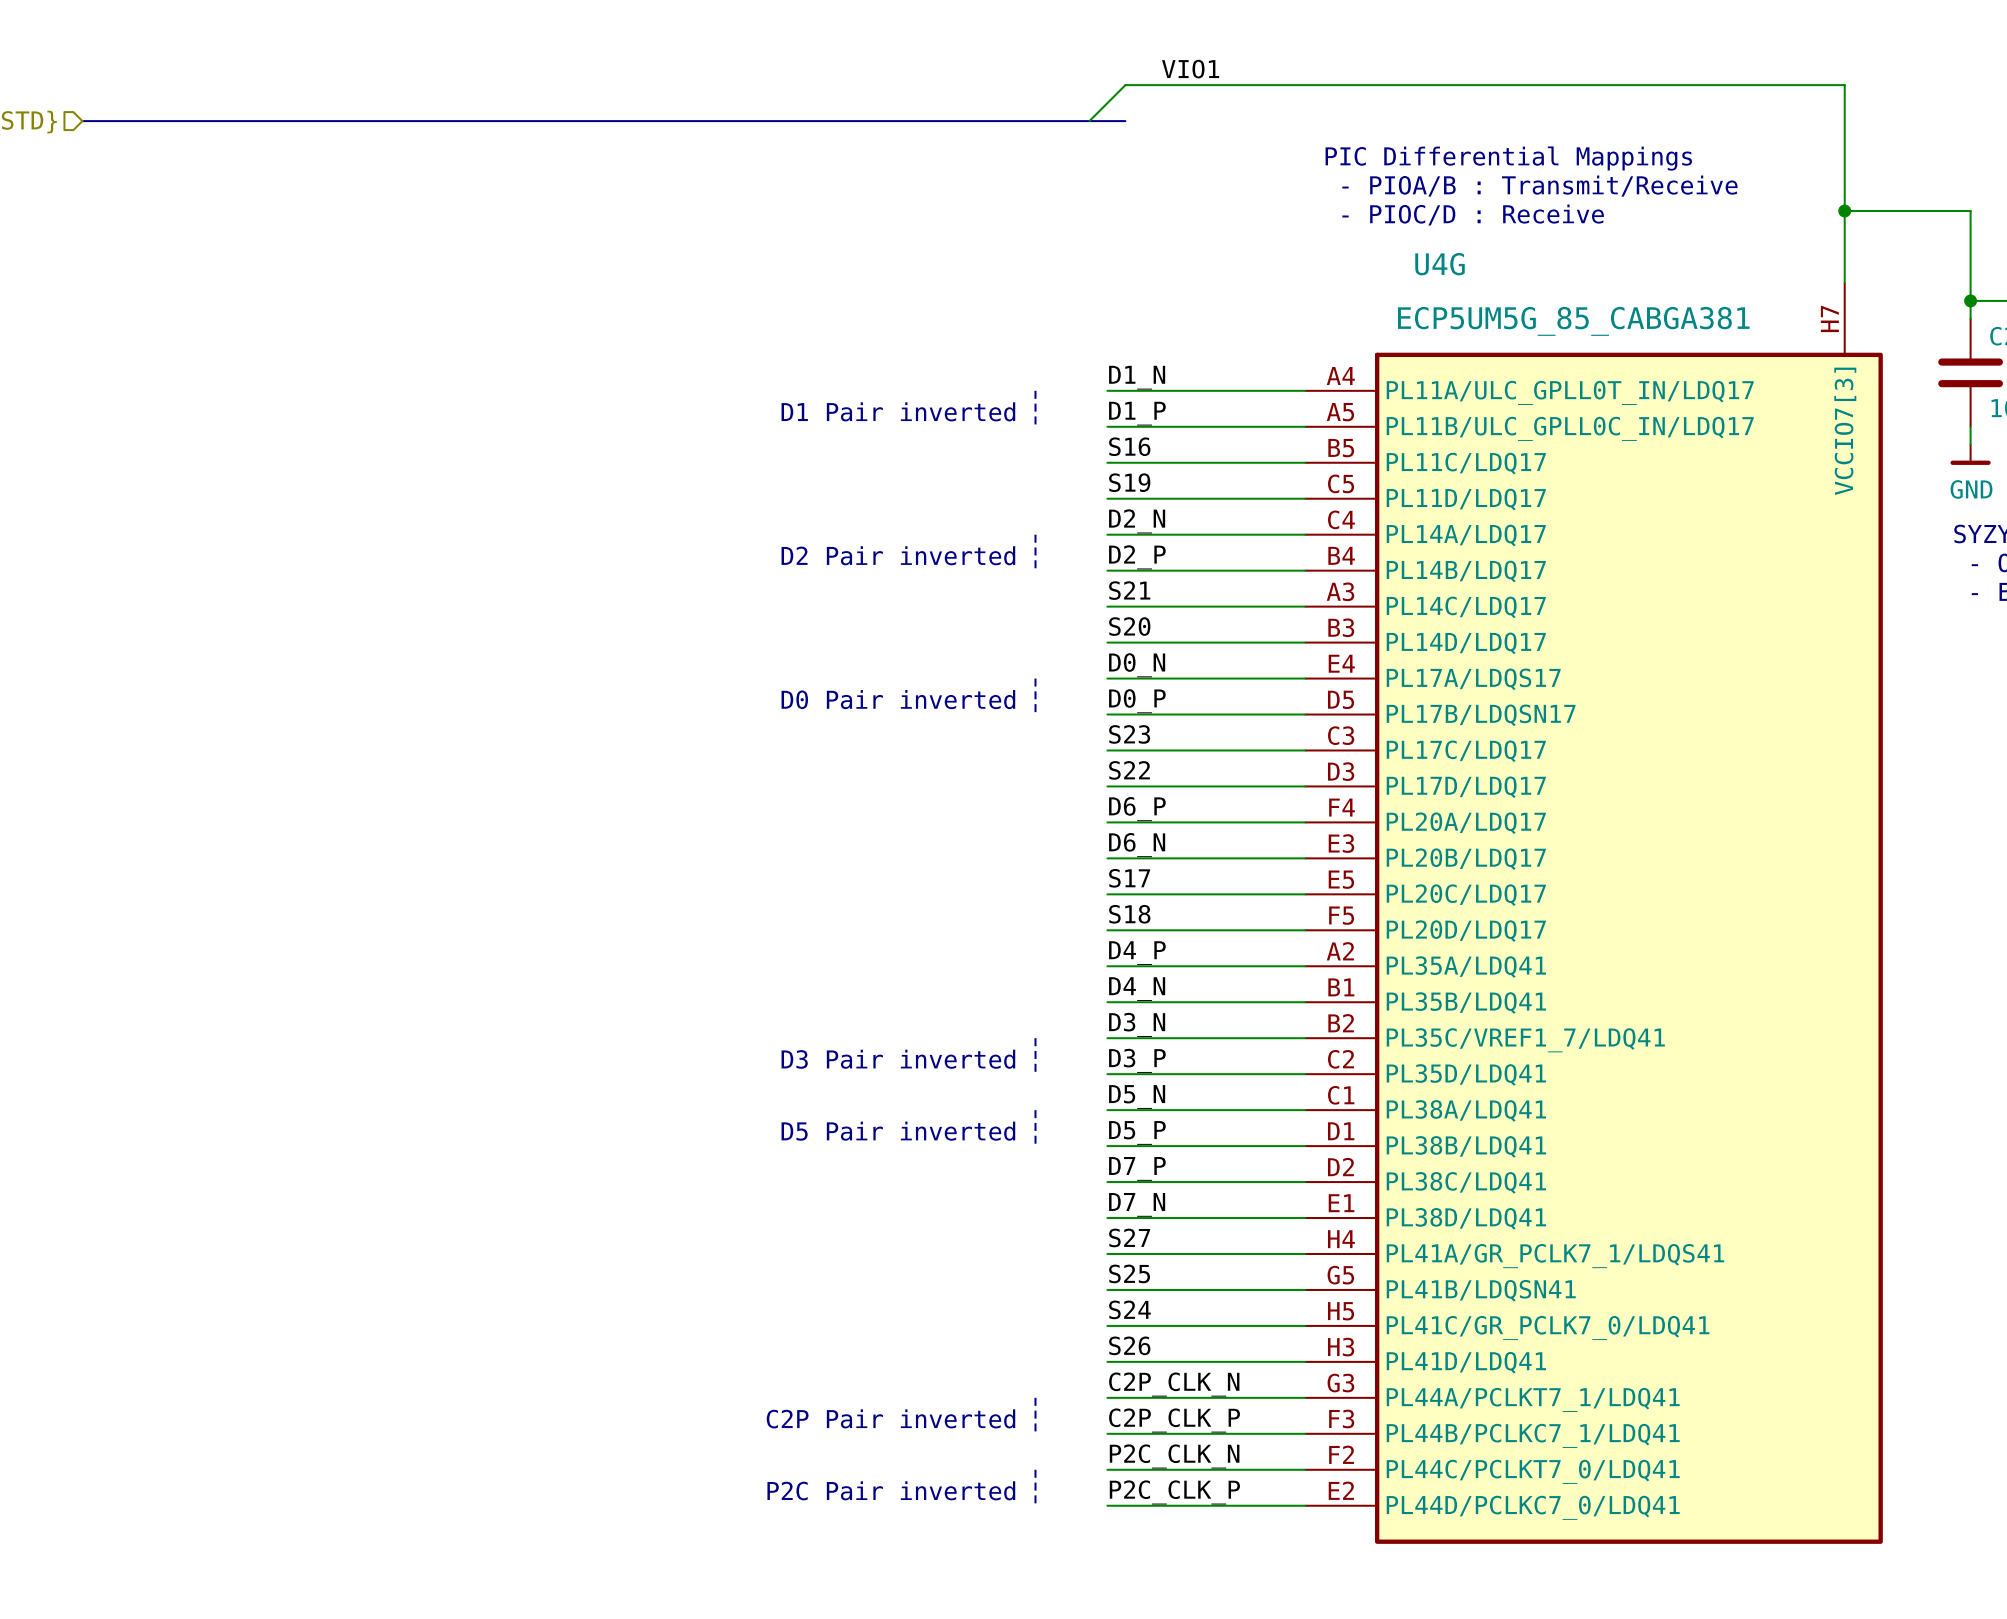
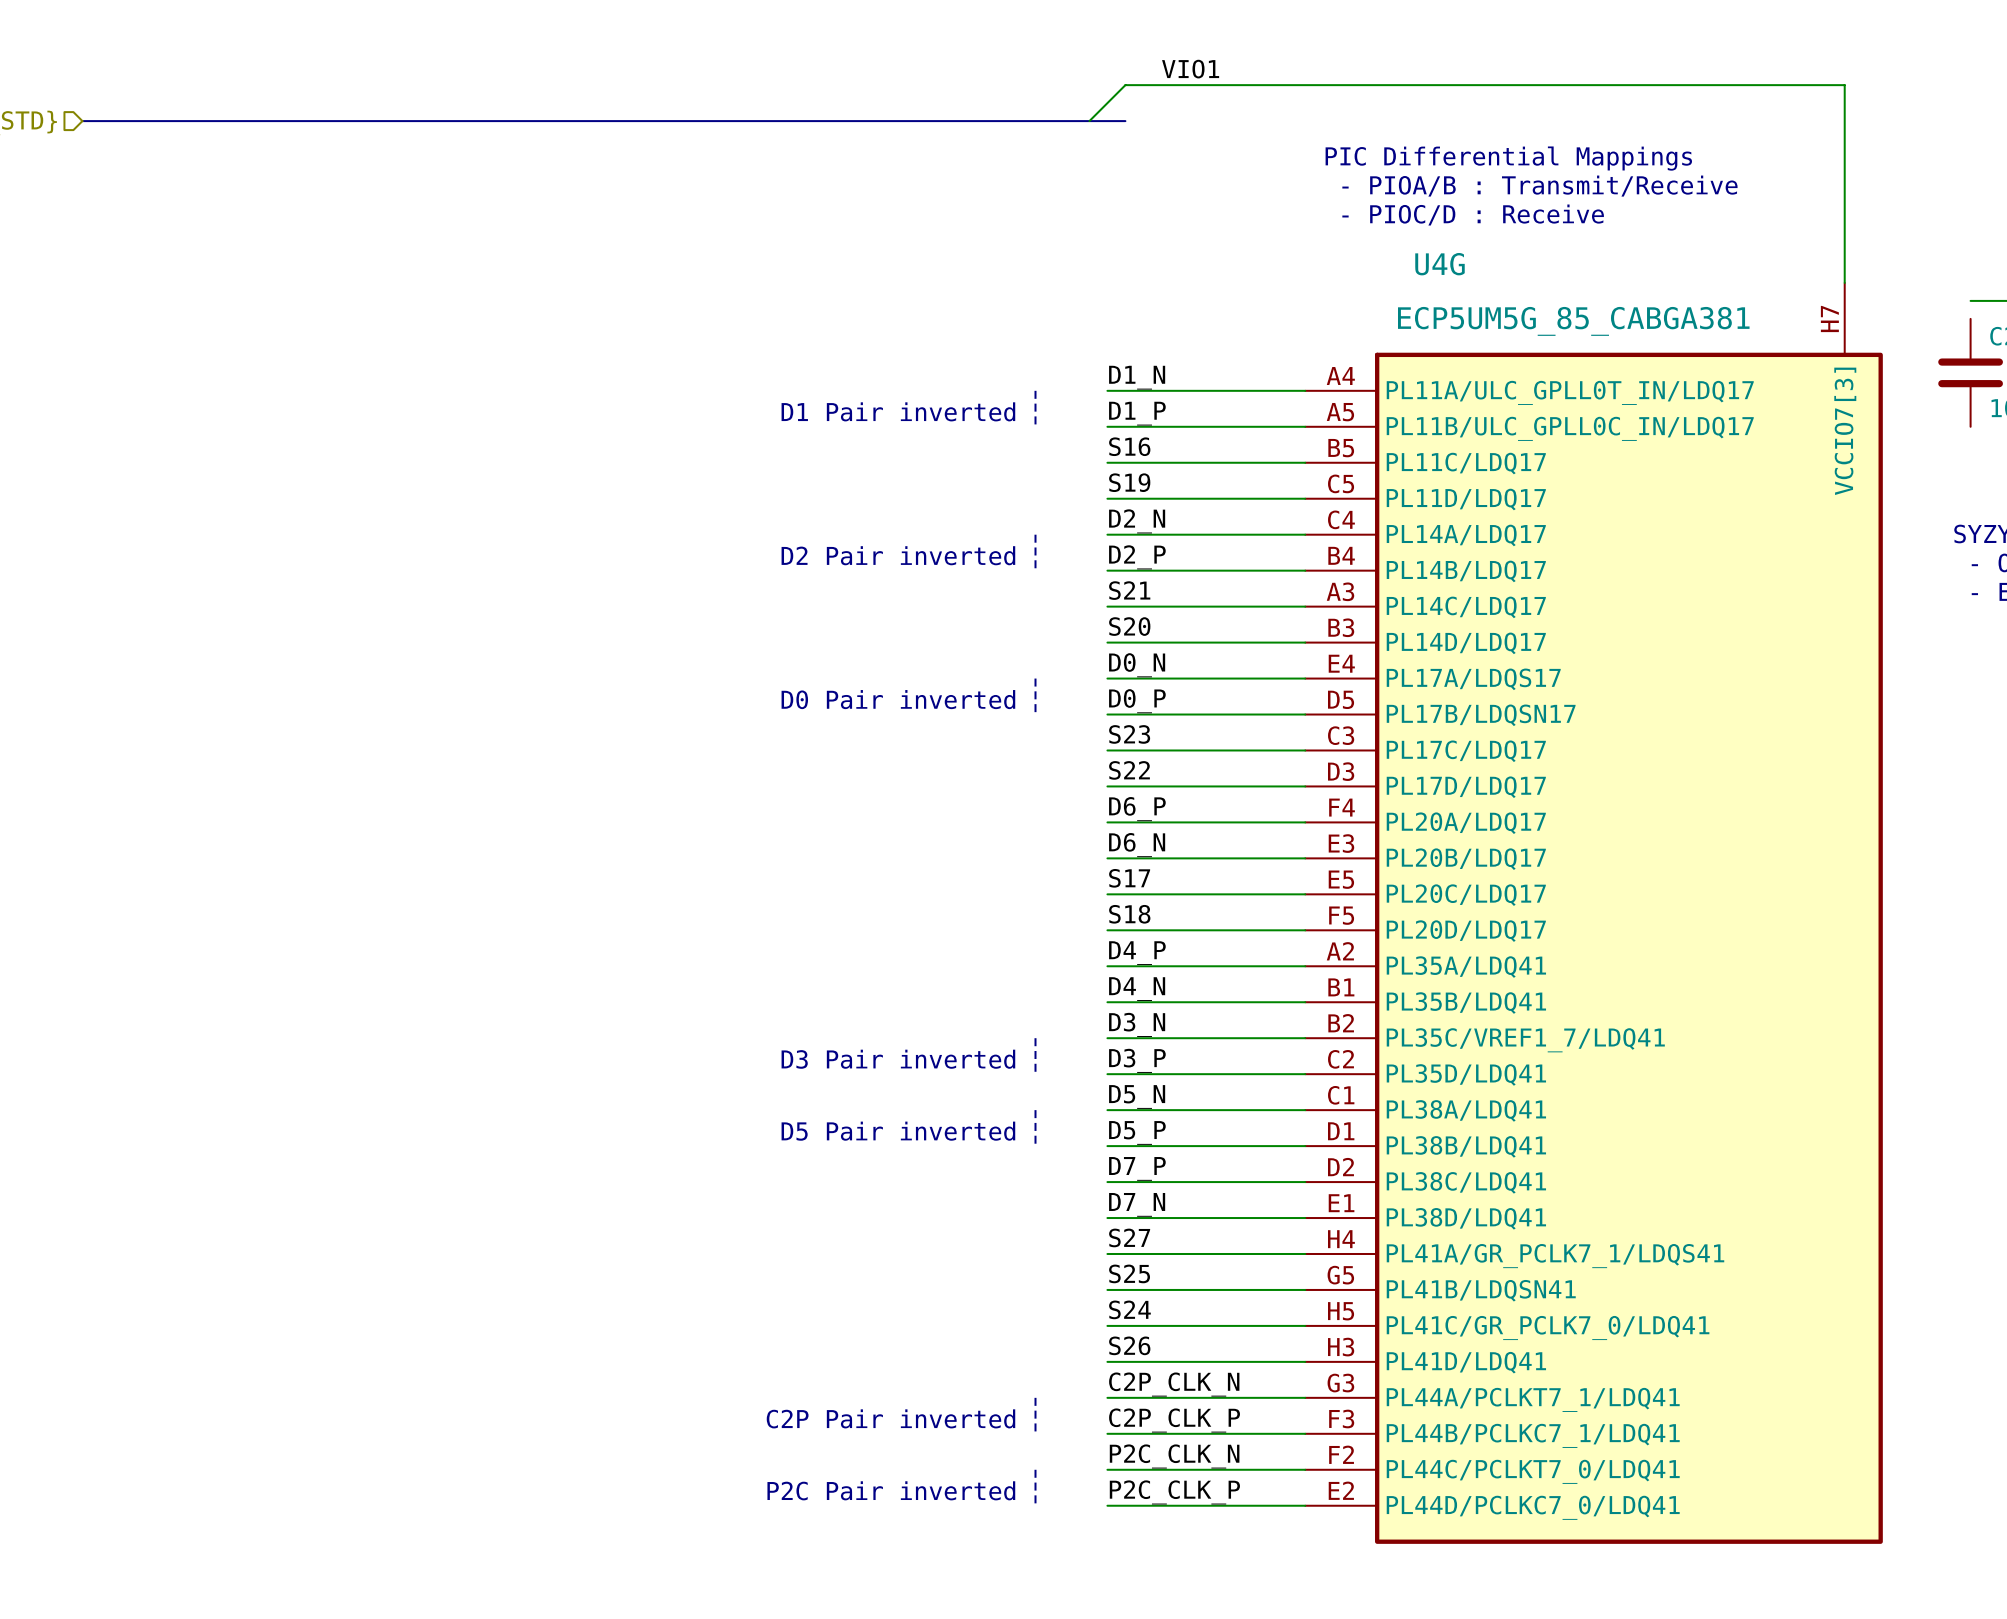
wire: (1844, 211) (1970, 211) (1970, 318) -> none
junction: (1844, 211) -> none
junction: (1970, 300) -> none
wire: (1970, 426) (1970, 444) -> none
power symbol: GND (1970, 454) -> none

